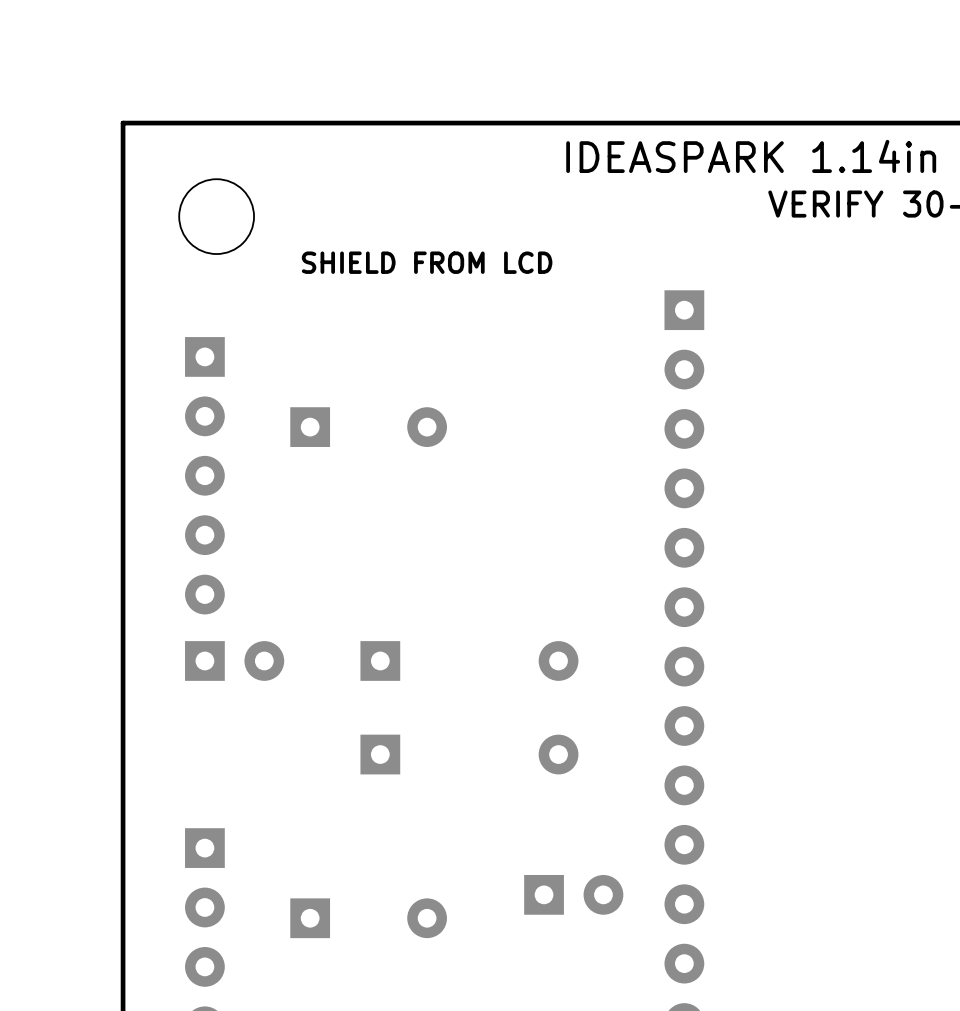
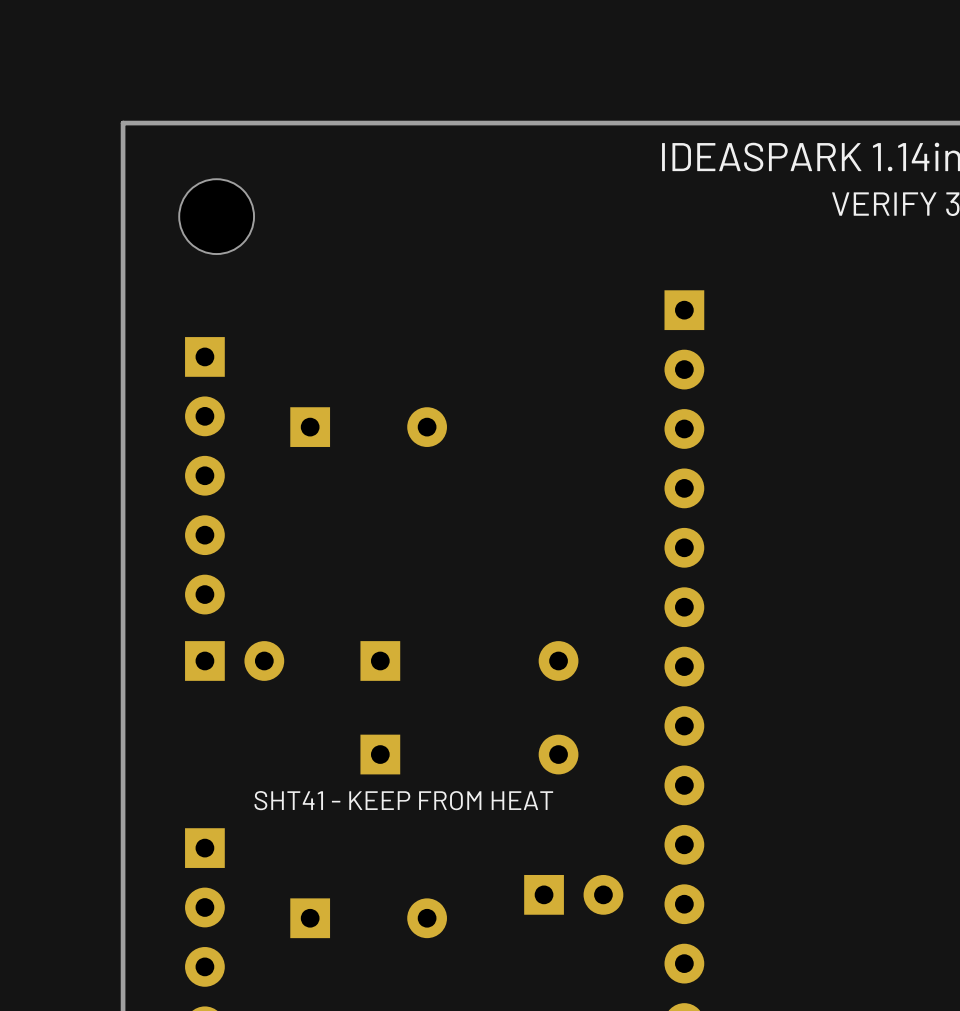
text: SHIELD FROM LCD (427, 262) -> none
text: none -> SHT41 - KEEP FROM HEAT (403, 800)

